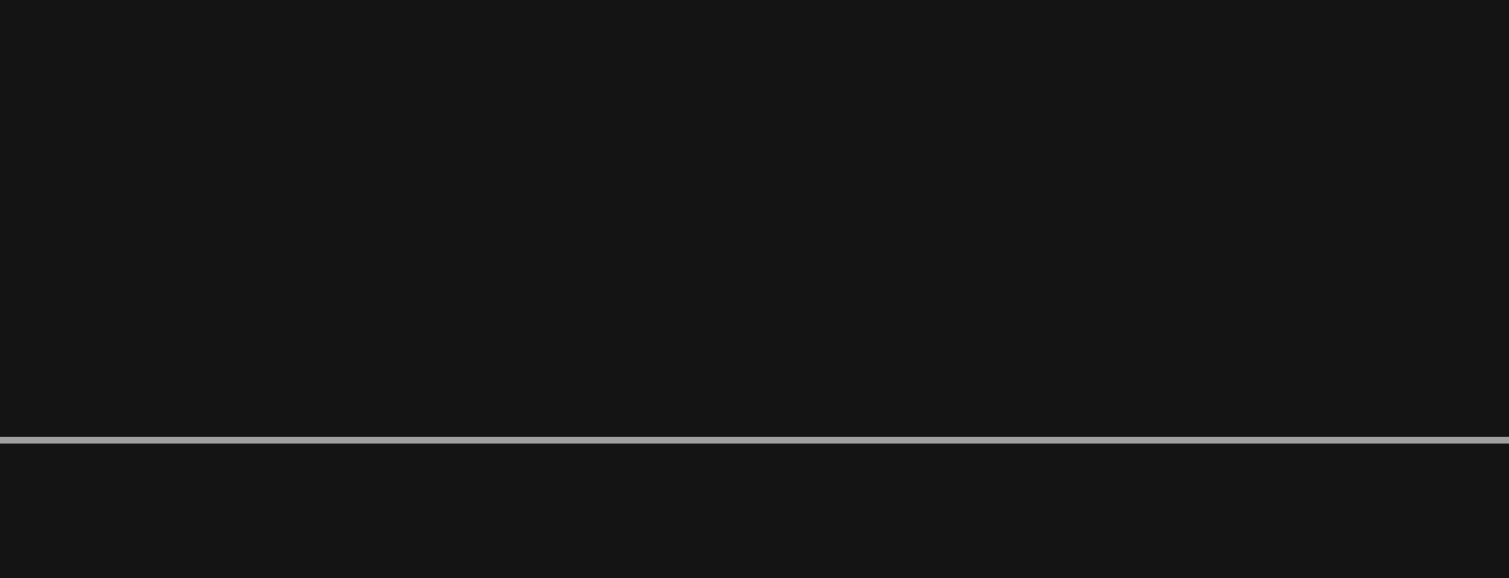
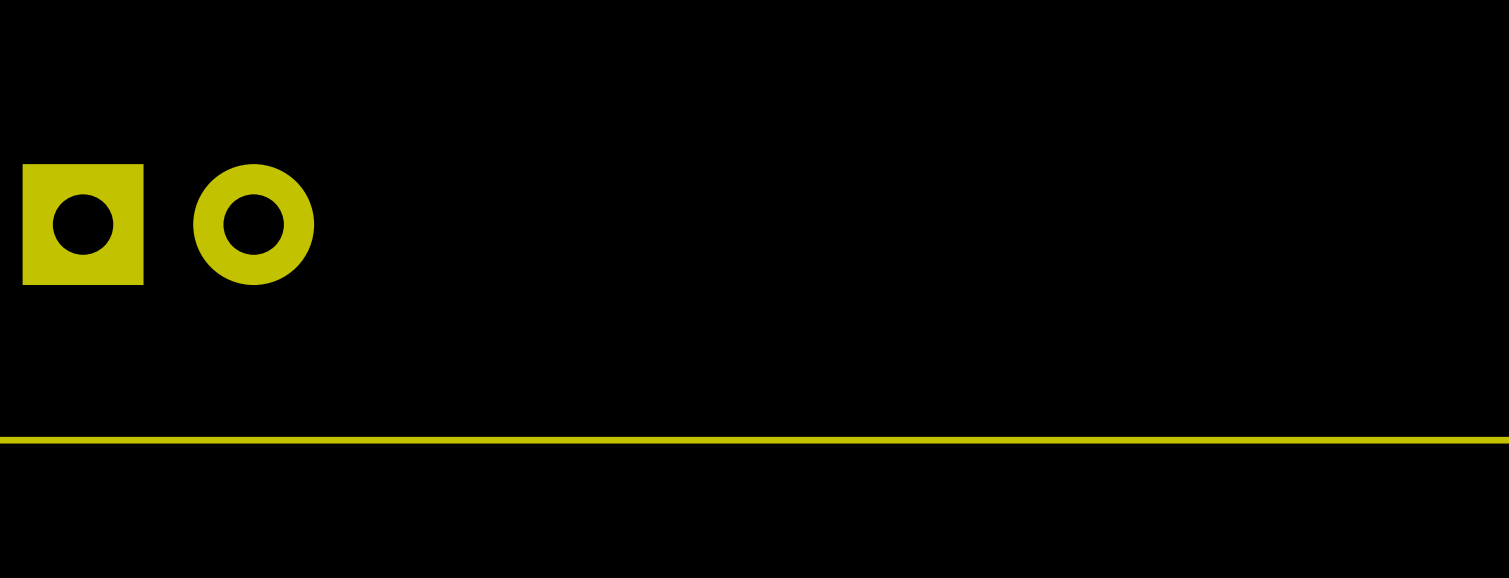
part: none -> (168, 224)

